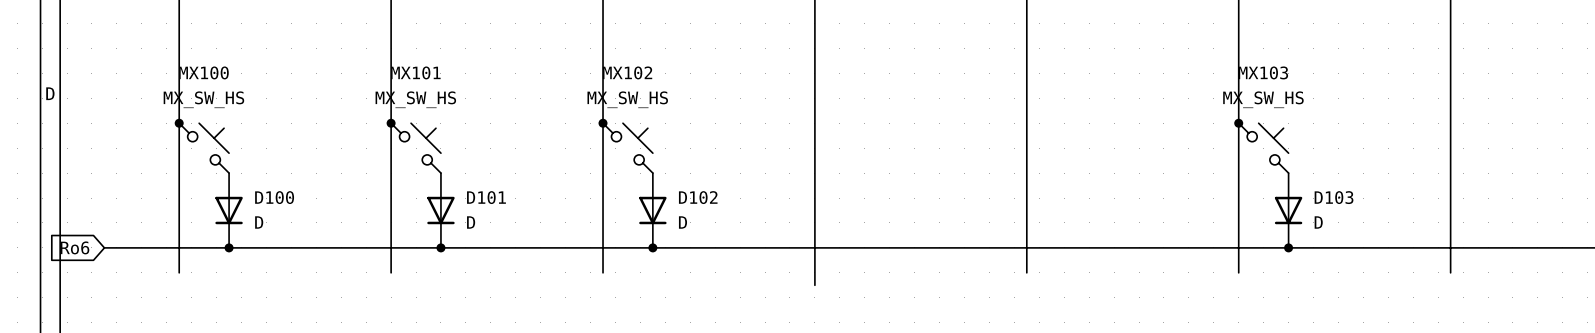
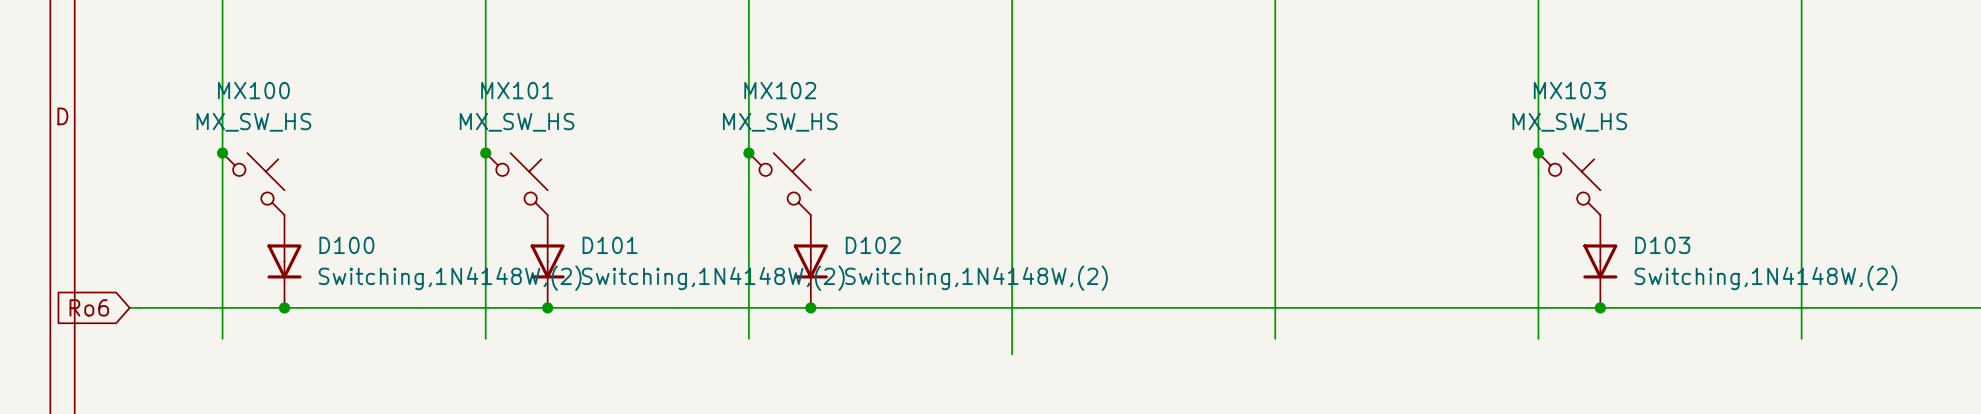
D100 symbol: [215, 173, 243, 248] -> [267, 215, 302, 308]
D101 symbol: [427, 173, 455, 248] -> [530, 215, 565, 308]
D102 symbol: [639, 173, 667, 248] -> [793, 215, 828, 308]
D103 symbol: [1274, 173, 1303, 248] -> [1583, 215, 1618, 308]
D100 value: D (259, 222) -> Switching,1N4148W,(2) (450, 278)
D101 value: D (471, 222) -> Switching,1N4148W,(2) (713, 278)
D102 value: D (682, 222) -> Switching,1N4148W,(2) (976, 278)
D103 value: D (1318, 222) -> Switching,1N4148W,(2) (1765, 278)

